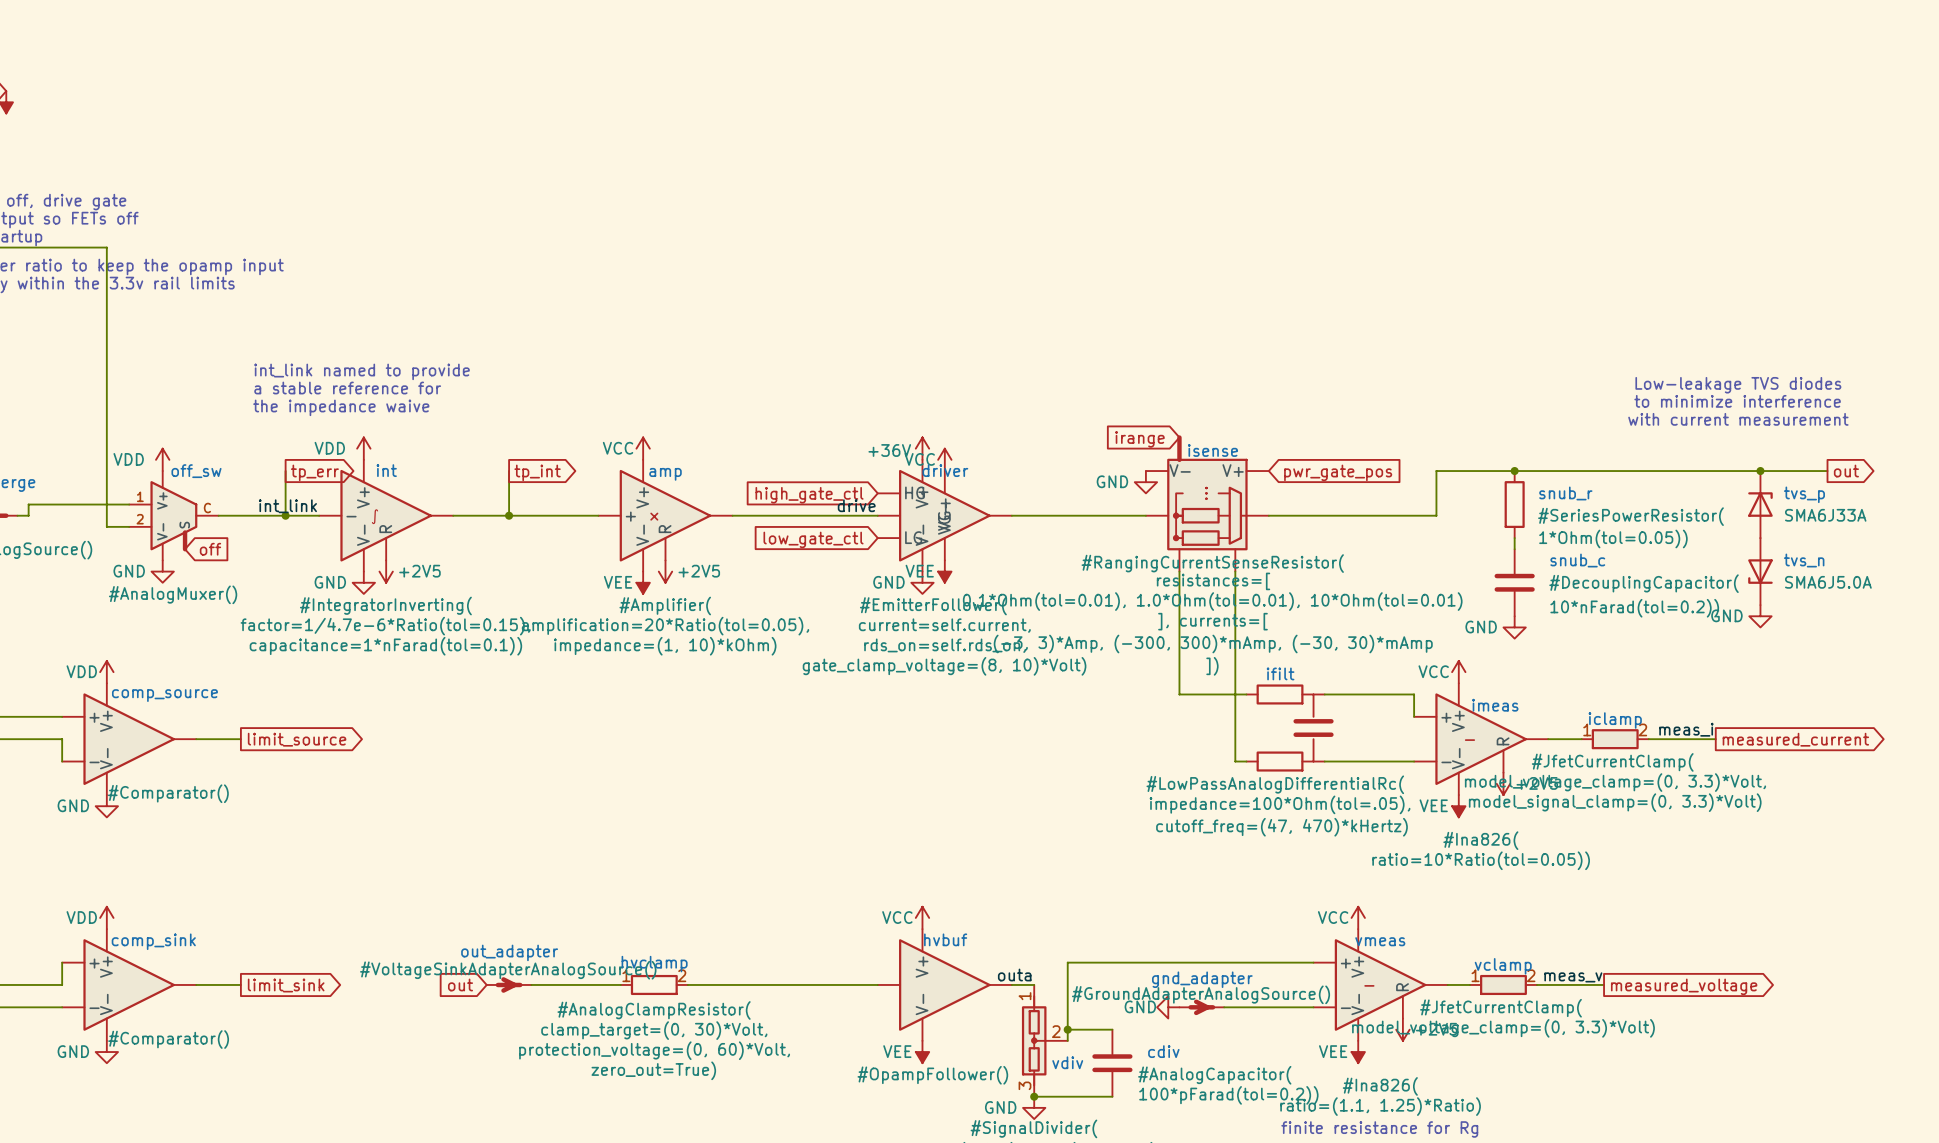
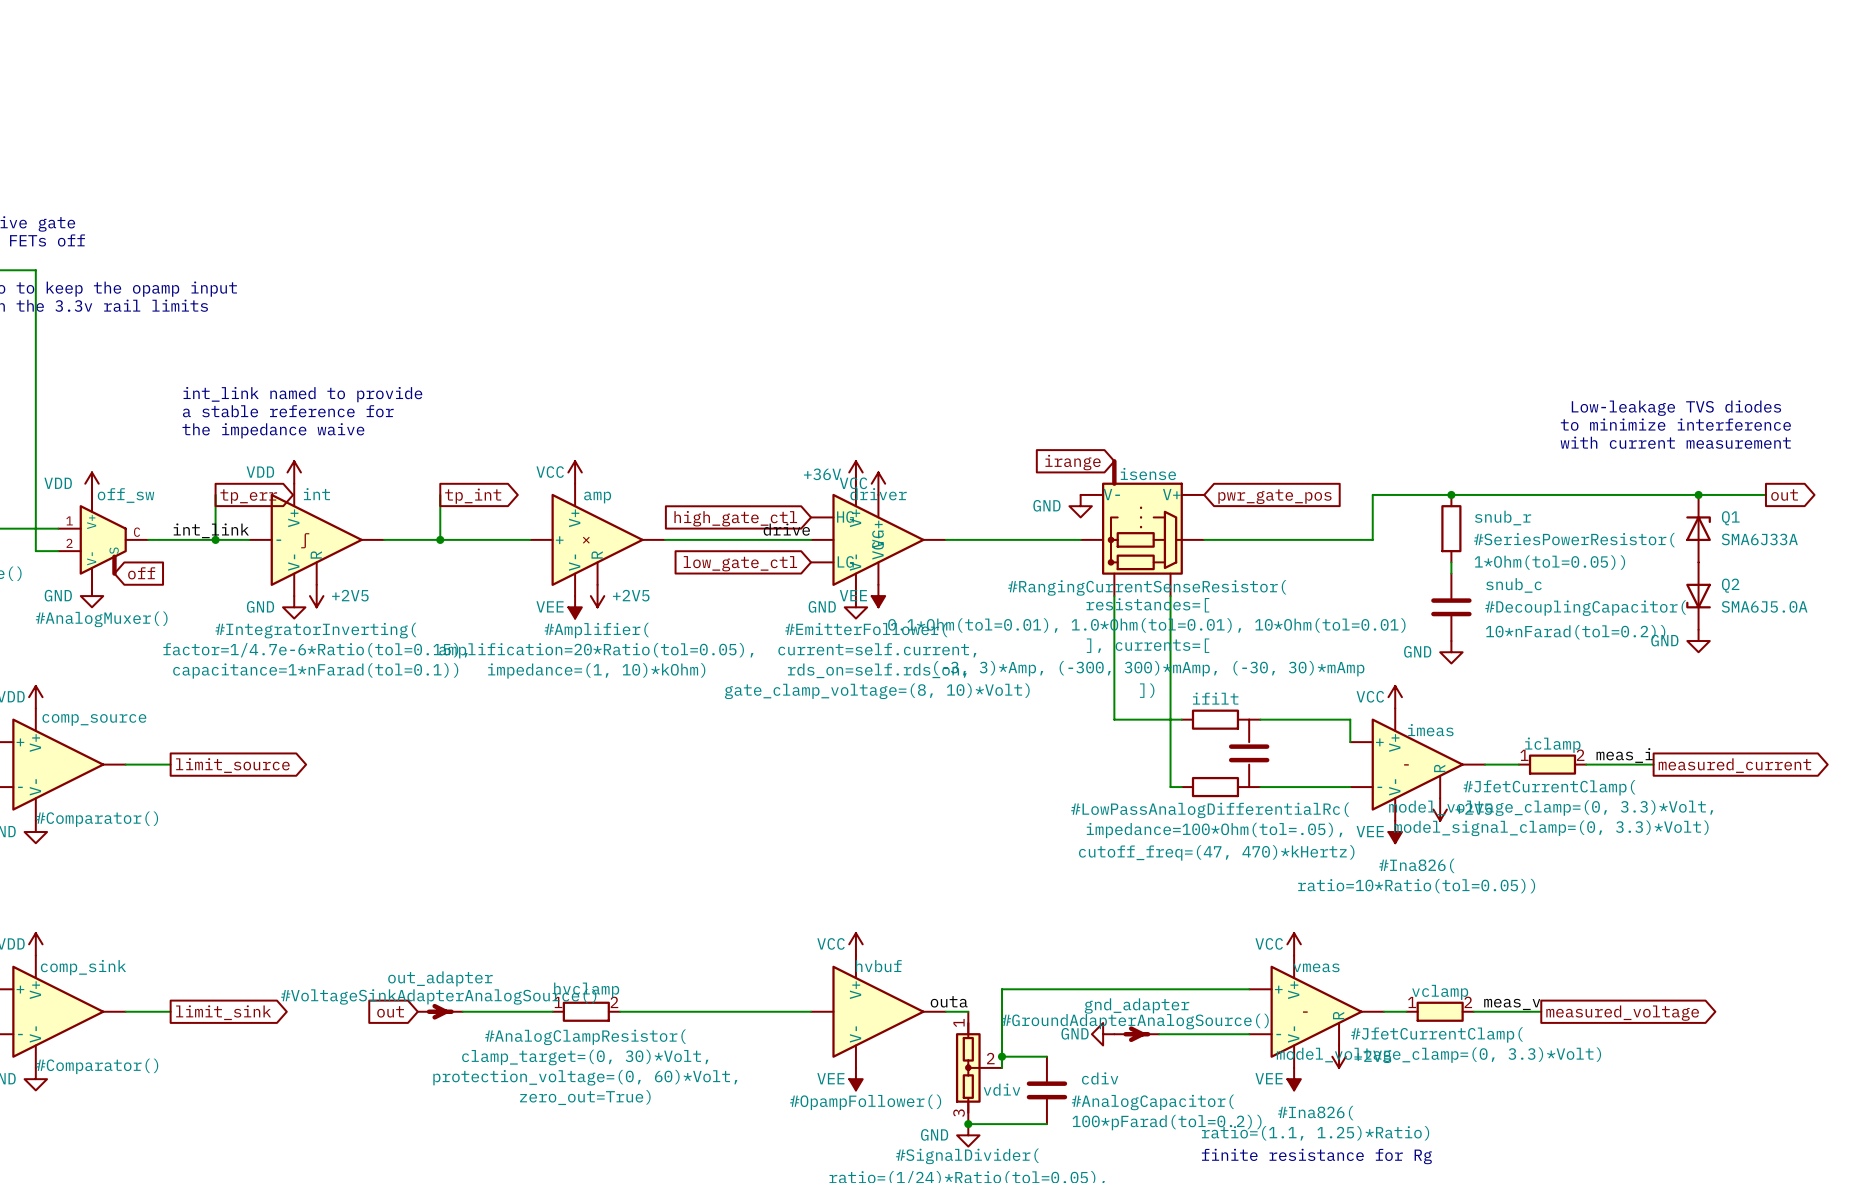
tvs_p name: tvs_p (1804, 494) -> Q1 (1730, 518)
tvs_n name: tvs_n (1804, 560) -> Q2 (1730, 585)

